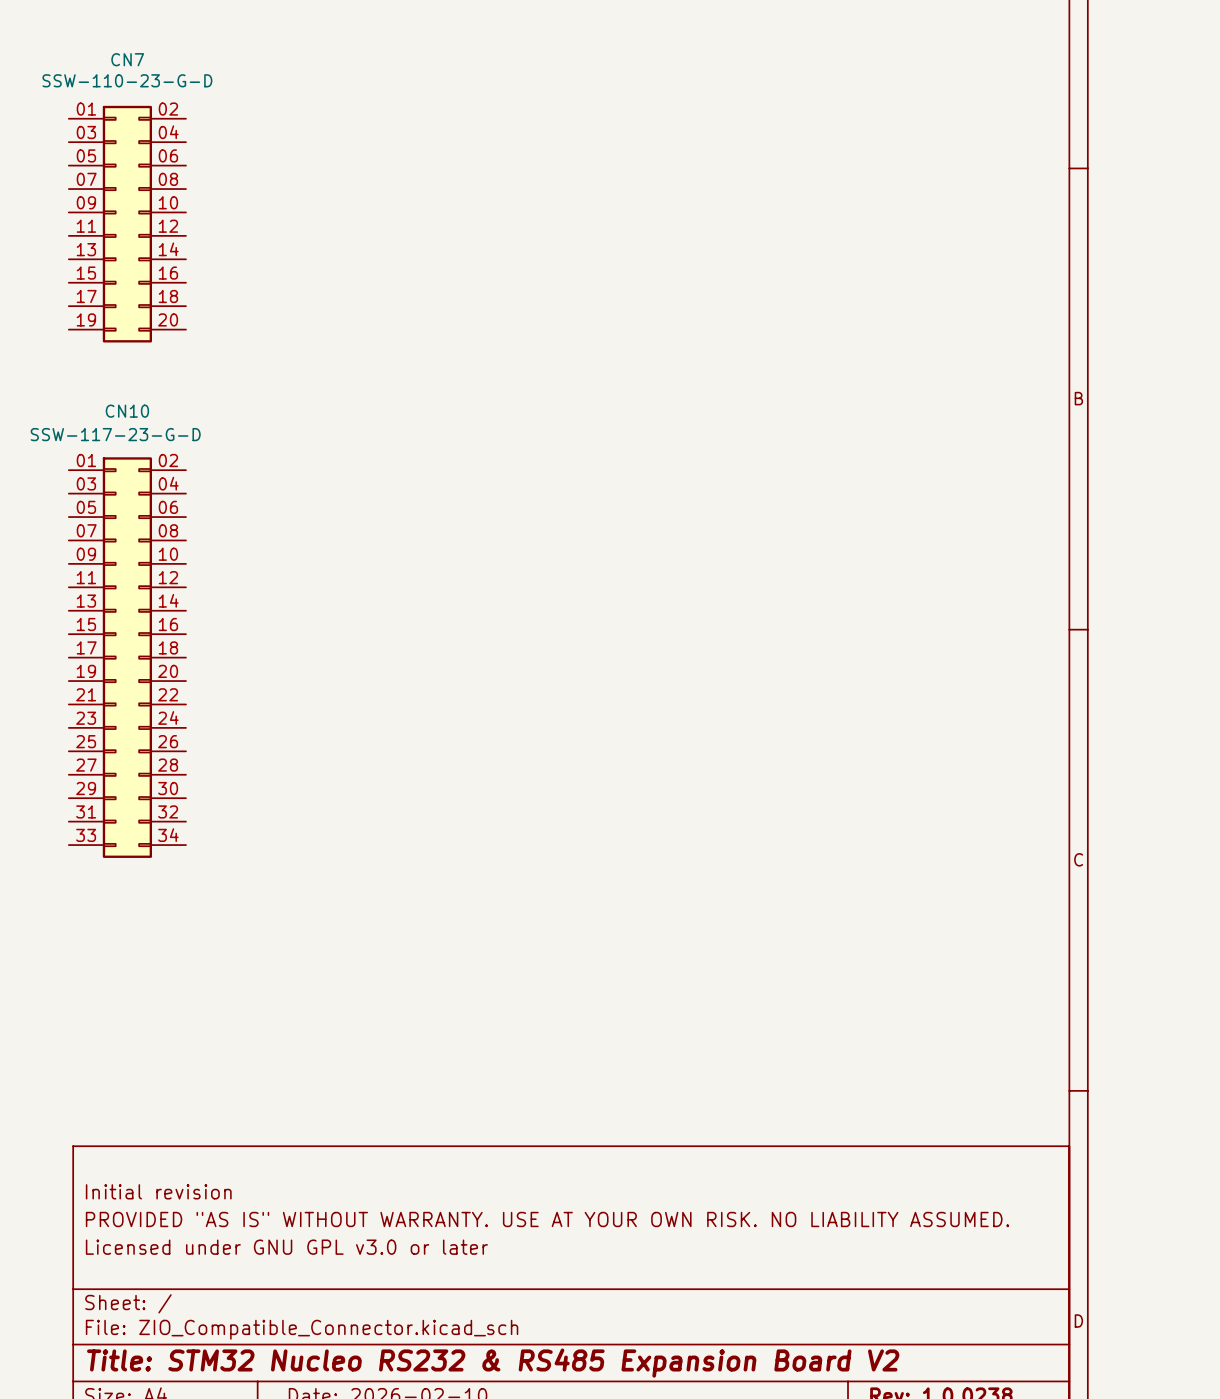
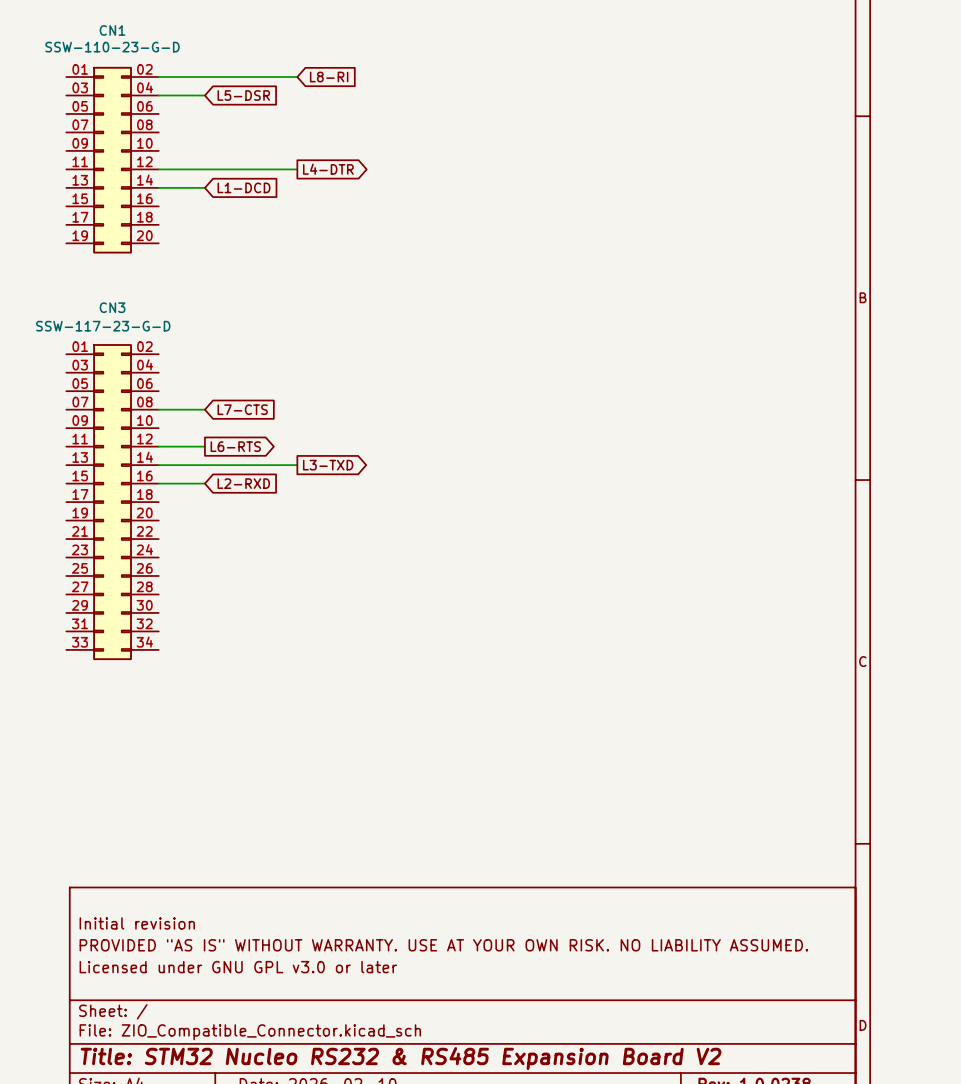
CN7 name: CN7 (127, 59) -> CN1 (112, 30)
wire: none -> (158, 77) (297, 77)
global label: none -> L8-RI (329, 77)
wire: none -> (158, 95) (204, 95)
global label: none -> L5-DSR (243, 95)
wire: none -> (158, 169) (297, 169)
global label: none -> L4-DTR (328, 169)
wire: none -> (158, 187) (204, 187)
global label: none -> L1-DCD (244, 187)
CN10 name: CN10 (127, 411) -> CN3 (112, 307)
wire: none -> (158, 409) (204, 409)
global label: none -> L7-CTS (242, 409)
wire: none -> (158, 446) (204, 446)
global label: none -> L6-RTS (235, 446)
wire: none -> (158, 465) (297, 465)
global label: none -> L3-TXD (328, 465)
wire: none -> (158, 483) (204, 483)
global label: none -> L2-RXD (243, 483)

